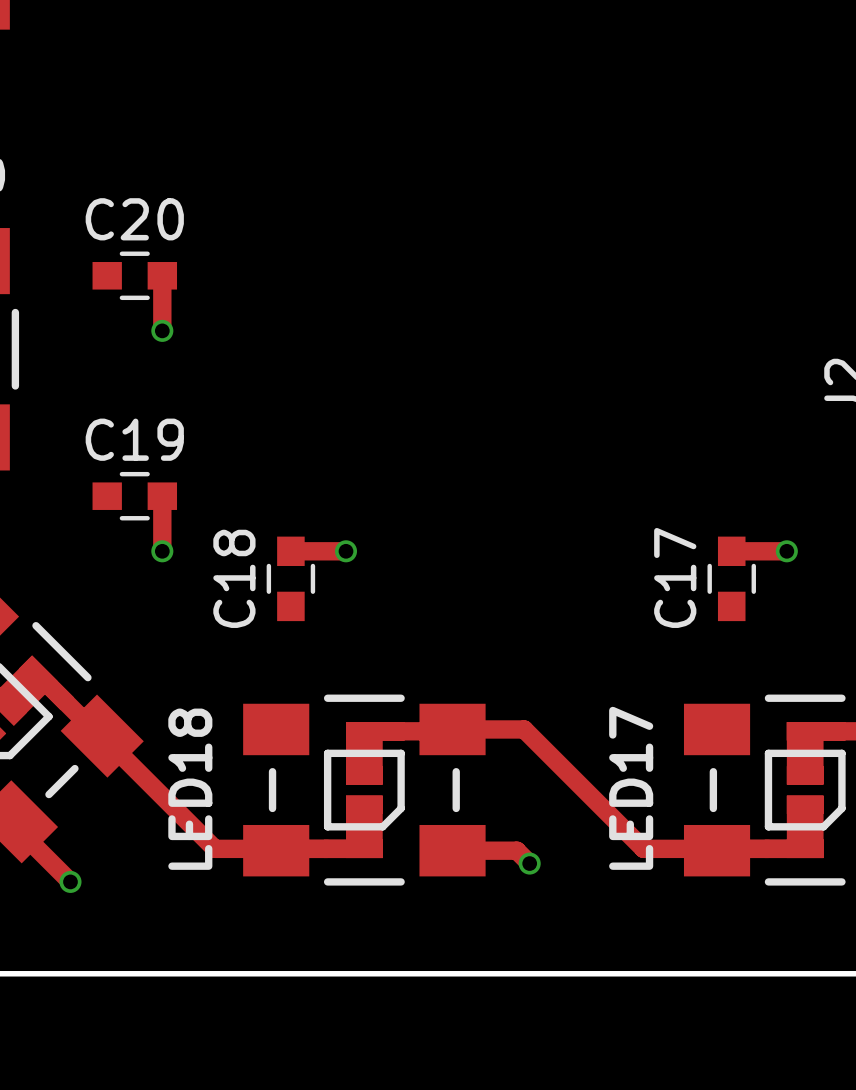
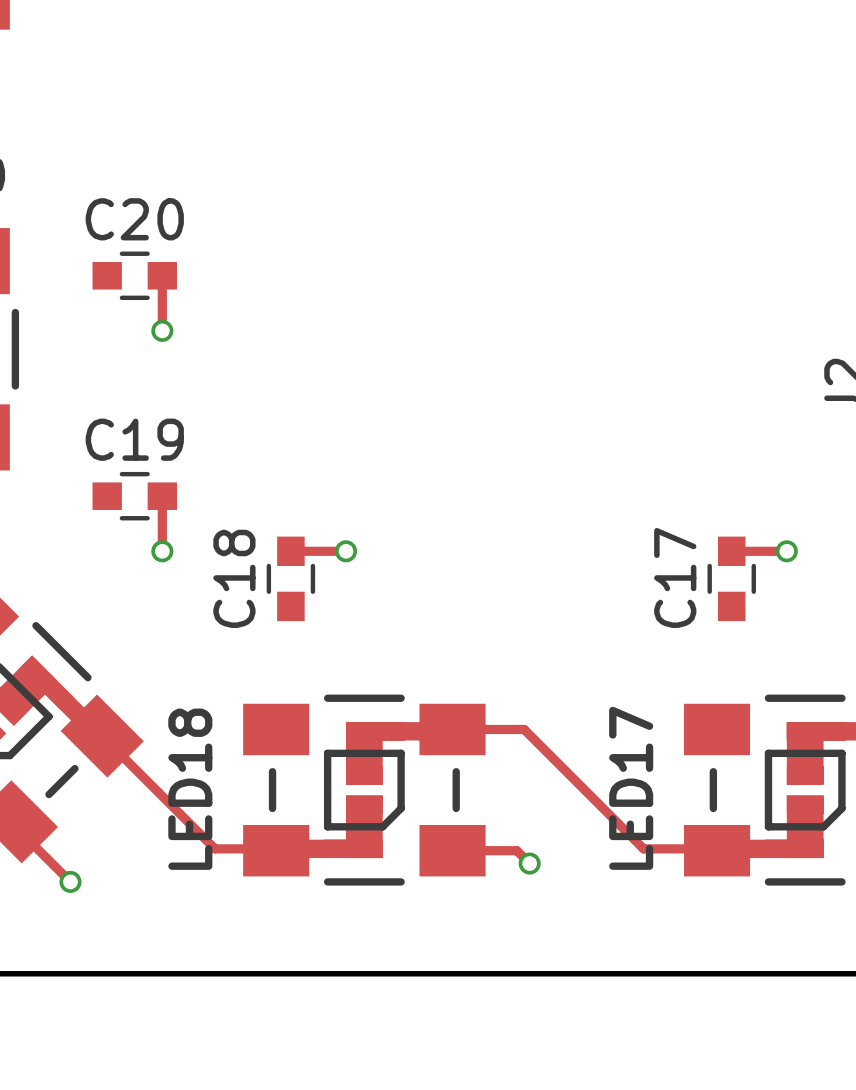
track width: thick (162, 275) (162, 330) -> thin (162, 275) (162, 330)
track width: thick (162, 496) (162, 551) -> thin (162, 496) (162, 551)
track width: thick (290, 551) (346, 551) -> thin (290, 551) (346, 551)
track width: thick (731, 551) (786, 551) -> thin (731, 551) (786, 551)
track width: thick (452, 729) (524, 729) (643, 848) (768, 848) -> thin (452, 729) (524, 729) (643, 848) (768, 848)
track width: thick (102, 736) (214, 848) (327, 848) -> thin (102, 736) (214, 848) (327, 848)
track width: thick (16, 821) (16, 827) (70, 881) -> thin (16, 821) (16, 827) (70, 881)
track width: thick (452, 850) (516, 850) (529, 863) -> thin (452, 850) (516, 850) (529, 863)

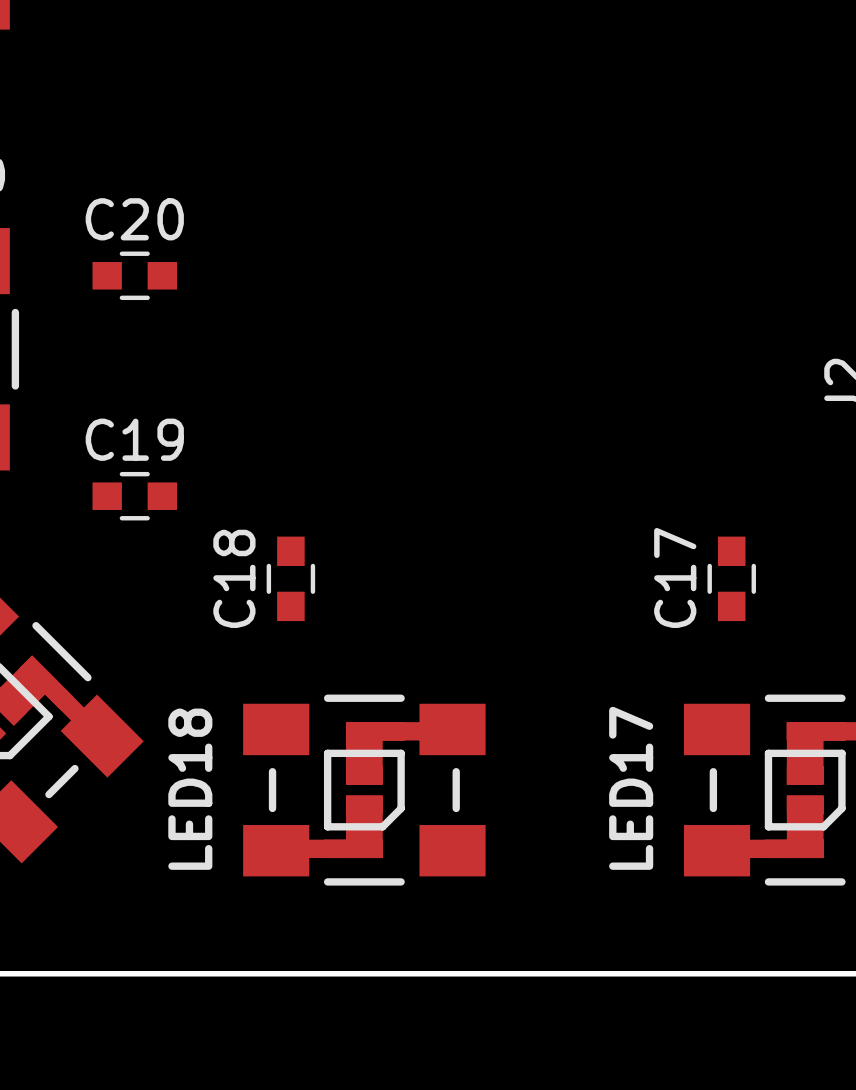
track: (162, 275) (162, 330) -> none
via: (162, 330) -> none
track: (162, 496) (162, 551) -> none
via: (162, 551) -> none
track: (290, 551) (346, 551) -> none
via: (346, 551) -> none
track: (731, 551) (786, 551) -> none
via: (786, 551) -> none
track: (452, 729) (524, 729) (643, 848) (768, 848) -> none
track: (102, 736) (214, 848) (327, 848) -> none
track: (16, 821) (16, 827) (70, 881) -> none
track: (452, 850) (516, 850) (529, 863) -> none
via: (529, 863) -> none
via: (70, 881) -> none

